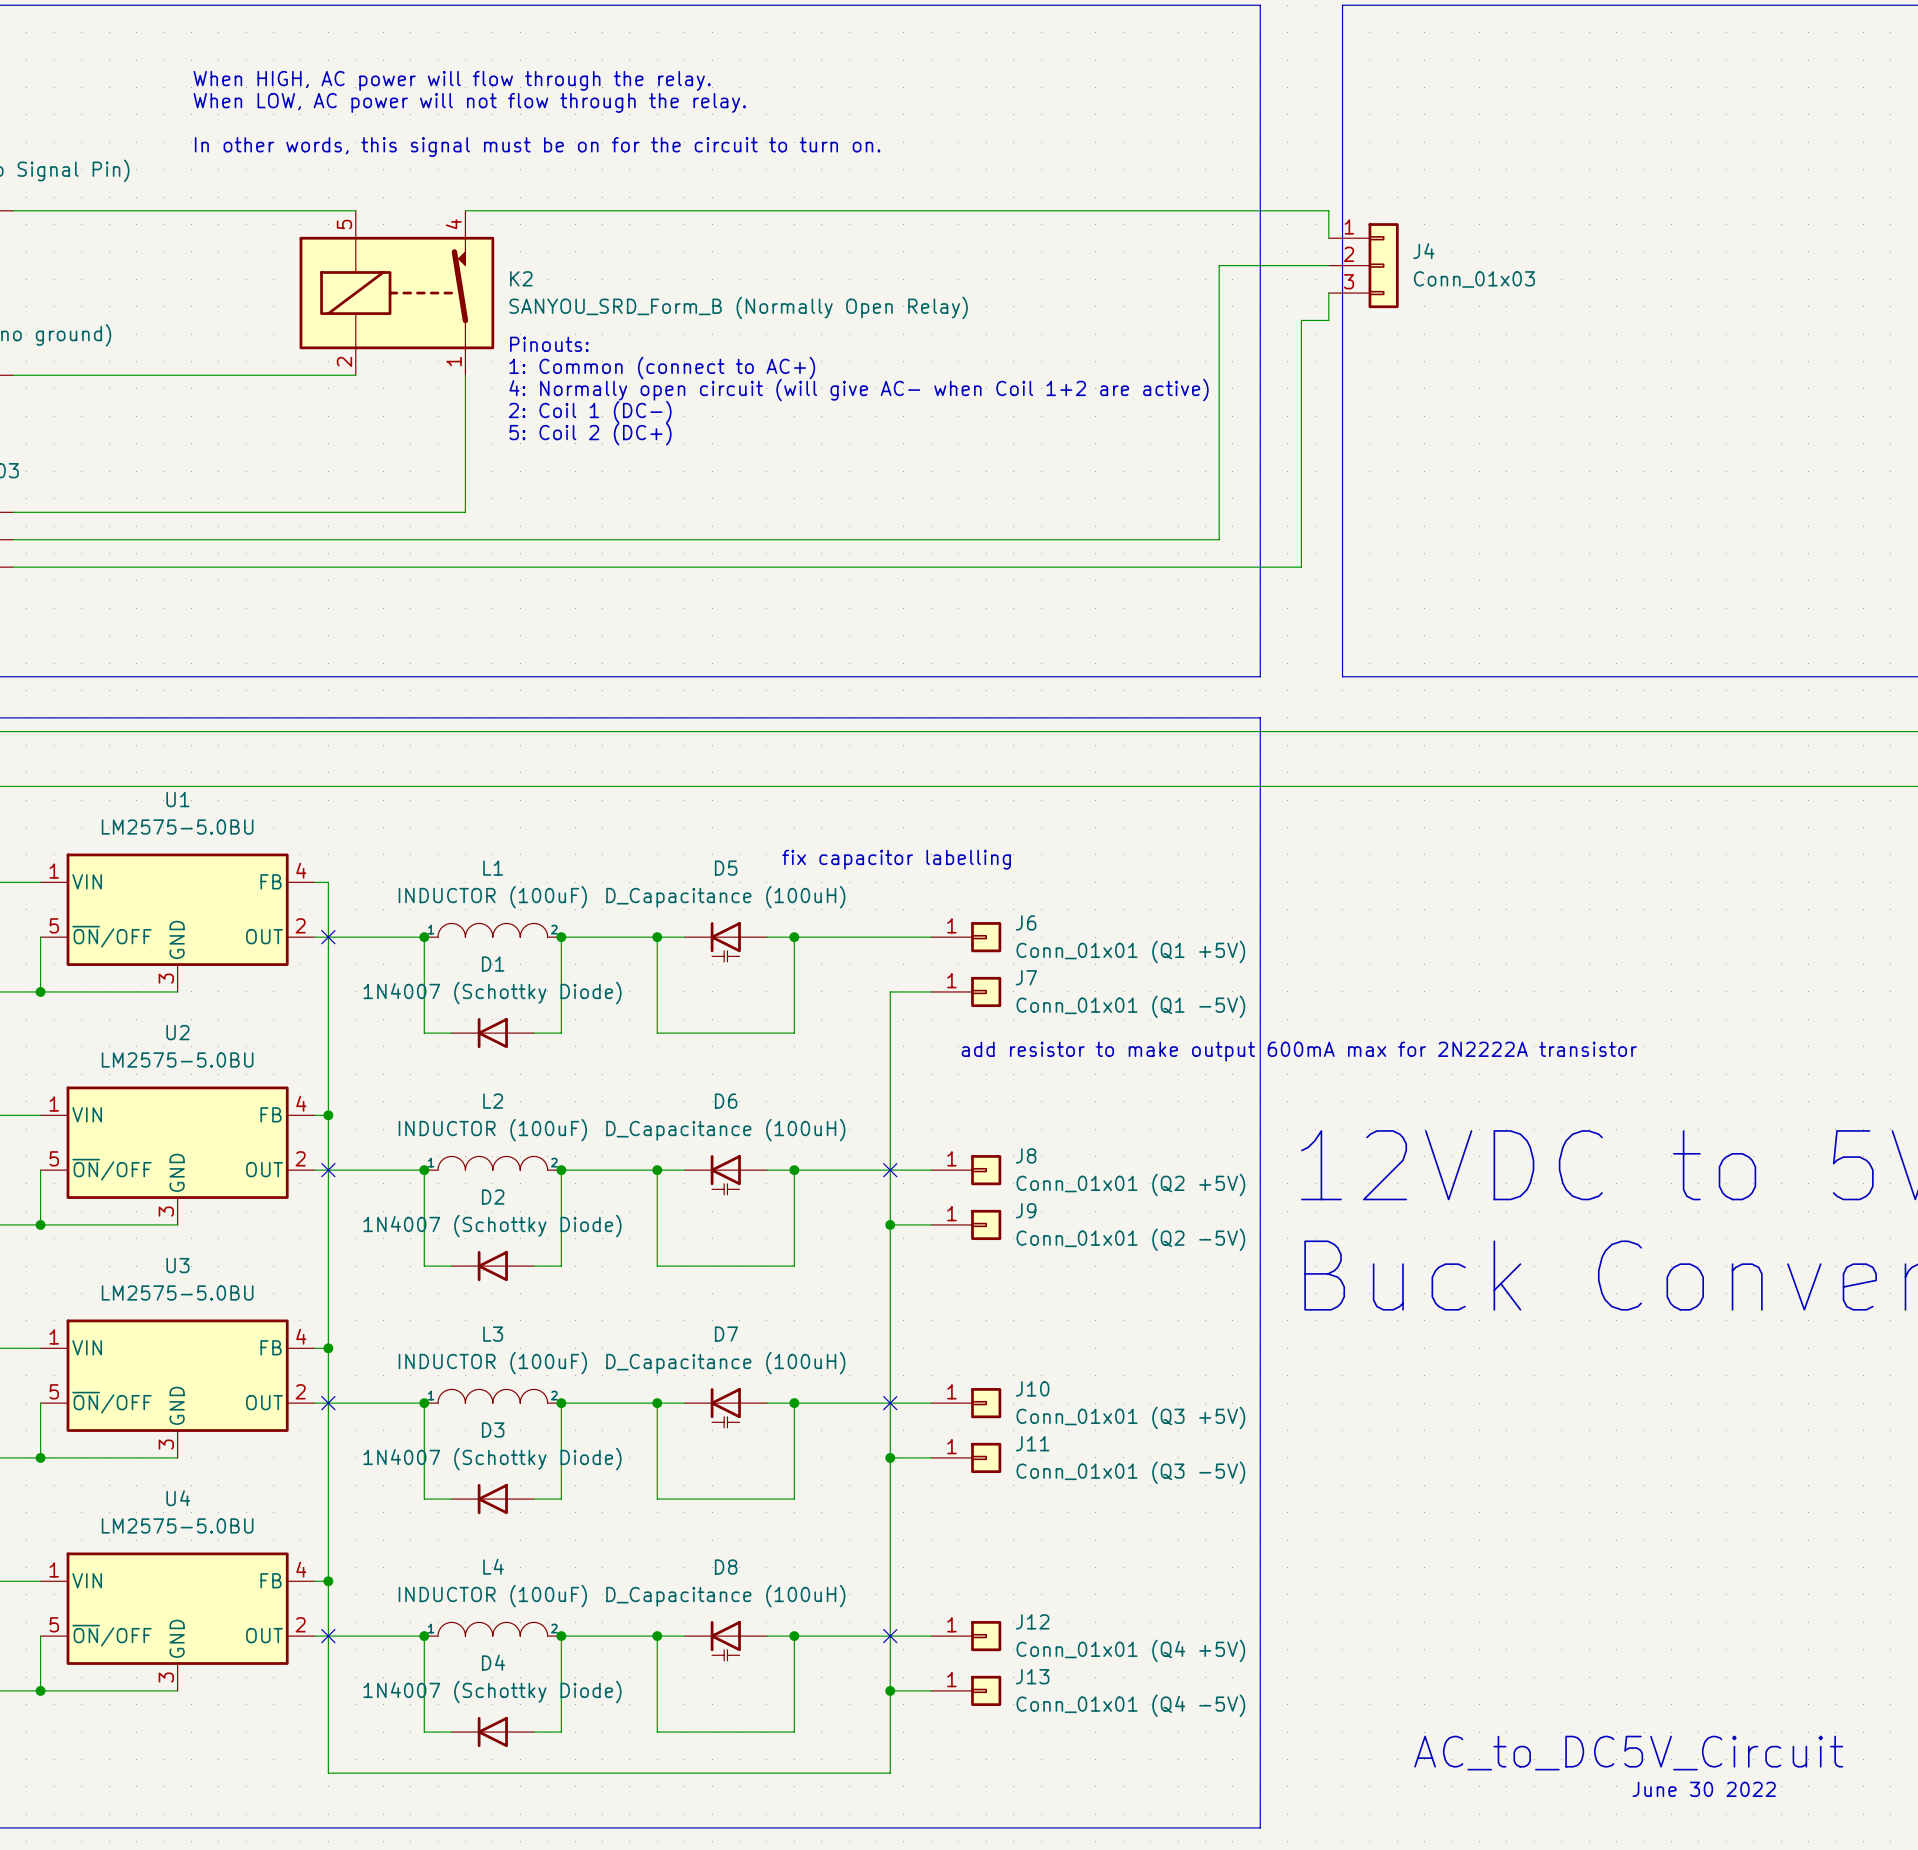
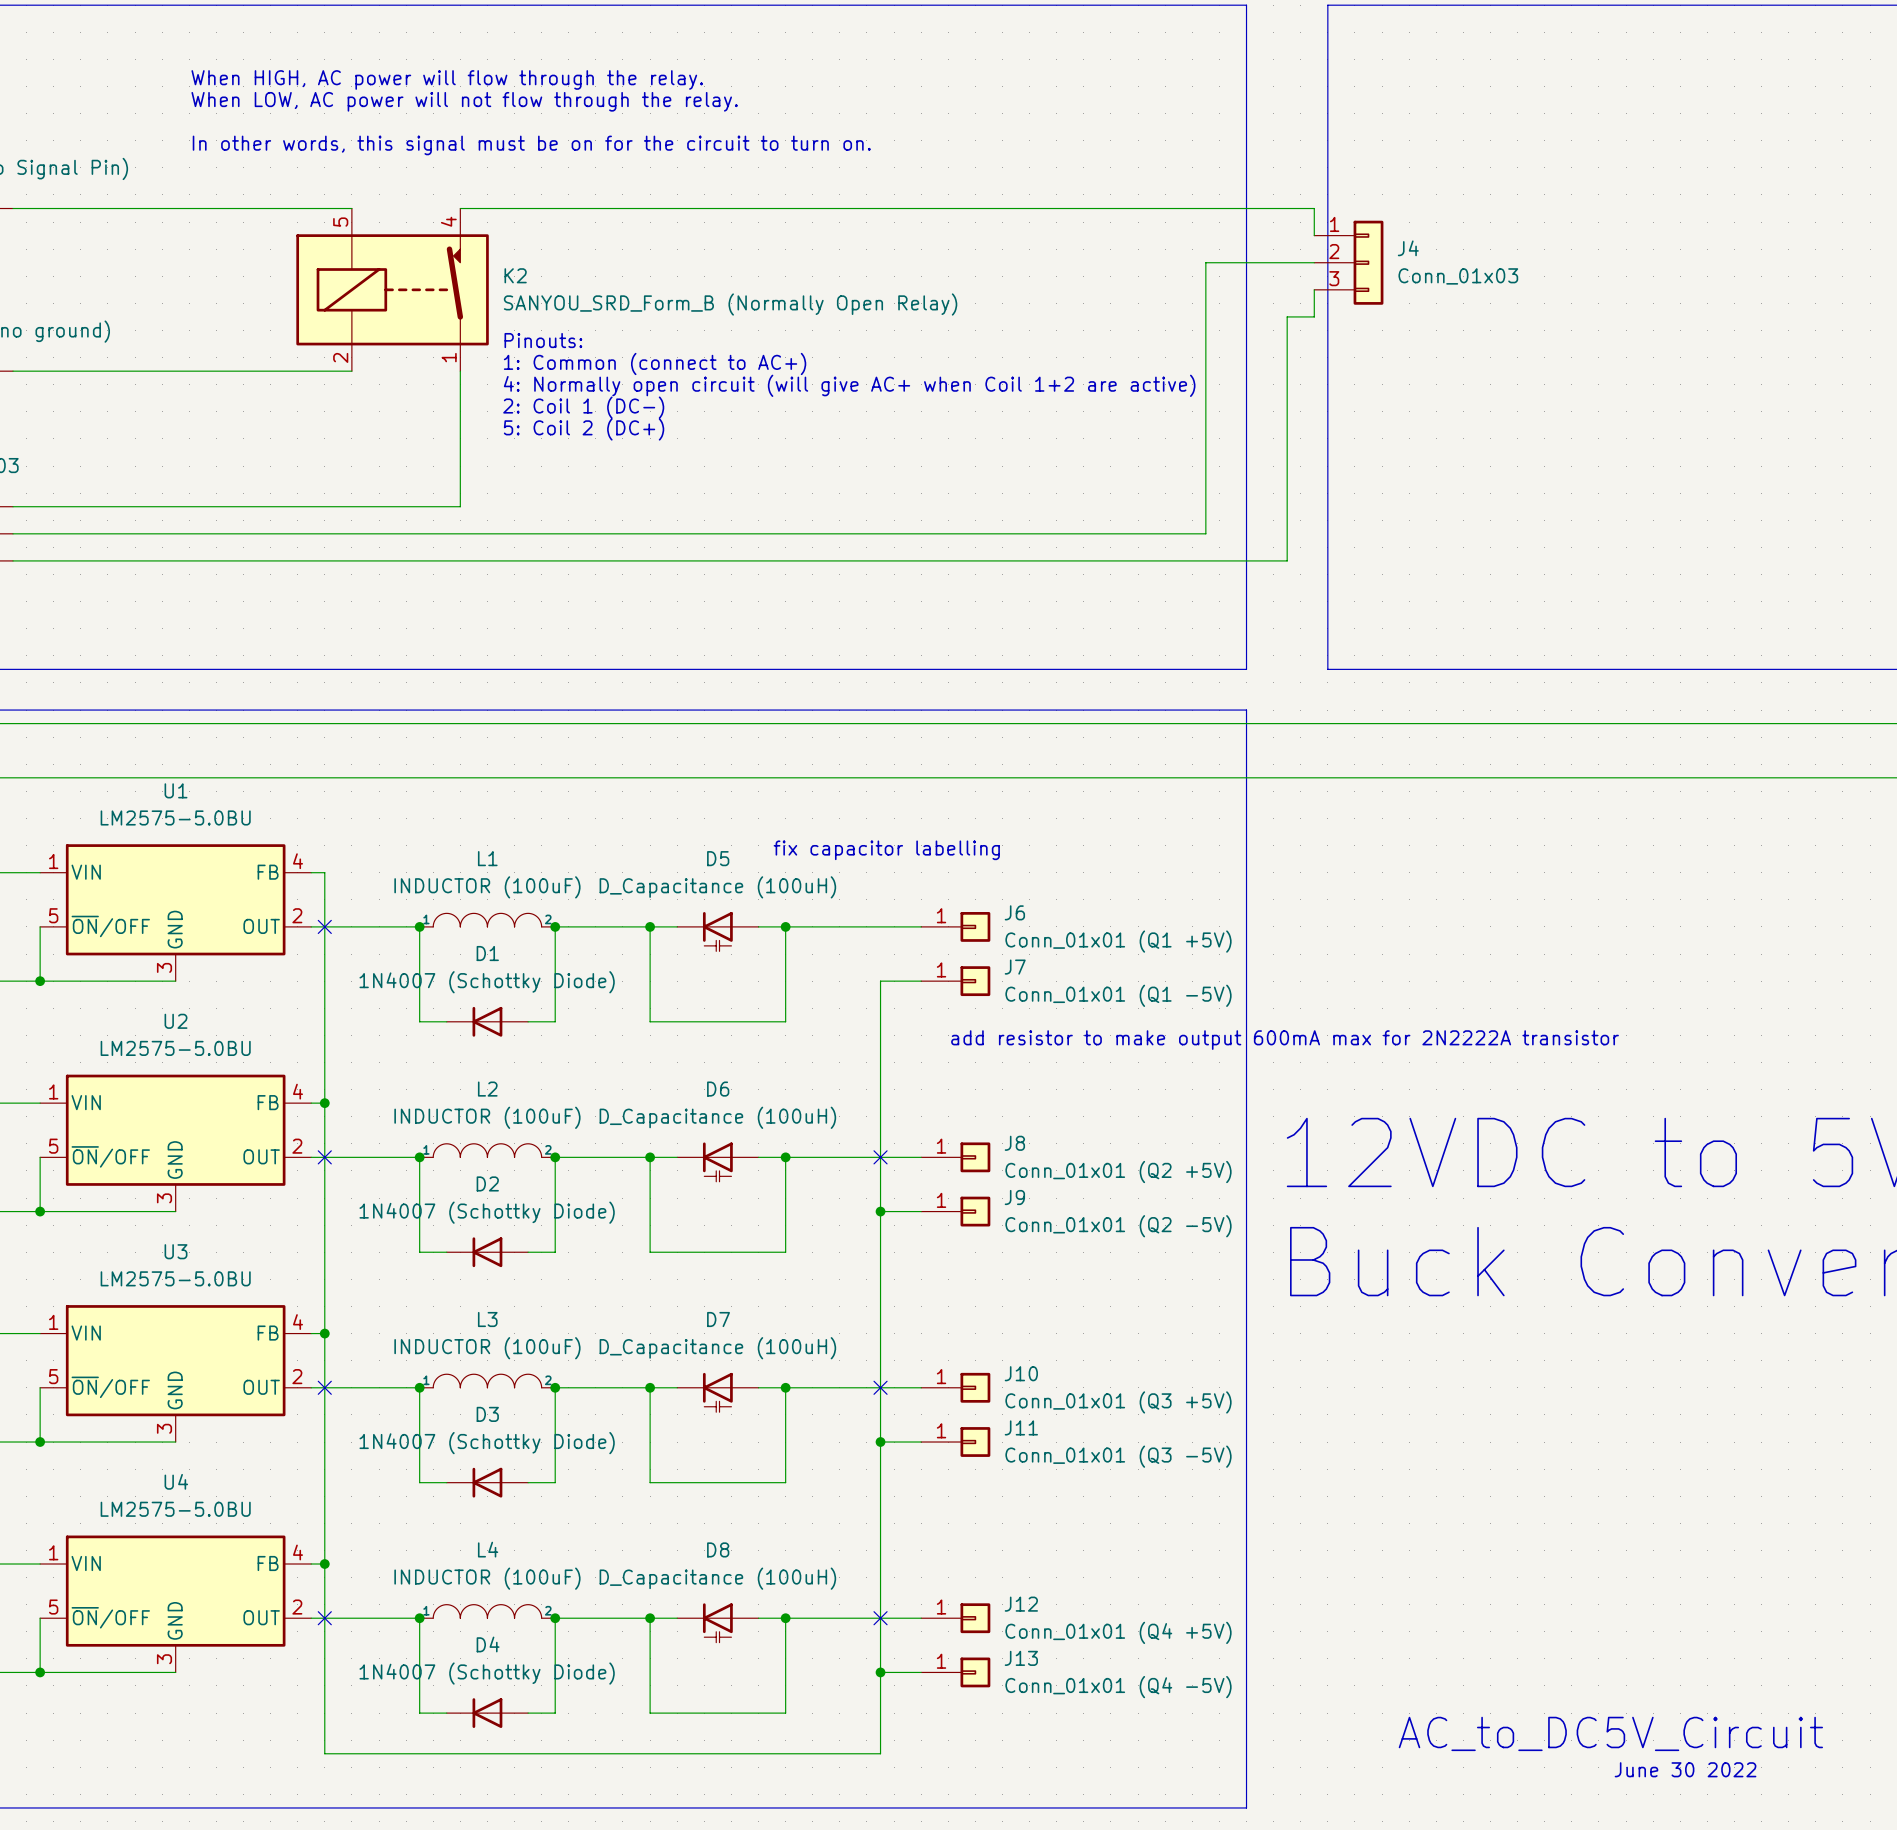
text: 4: Normally open circuit (will give AC- when Coil 1+2 are active) (859, 390) -> 4: Normally open circuit (will give AC+ when Coil 1+2 are active) (849, 385)

